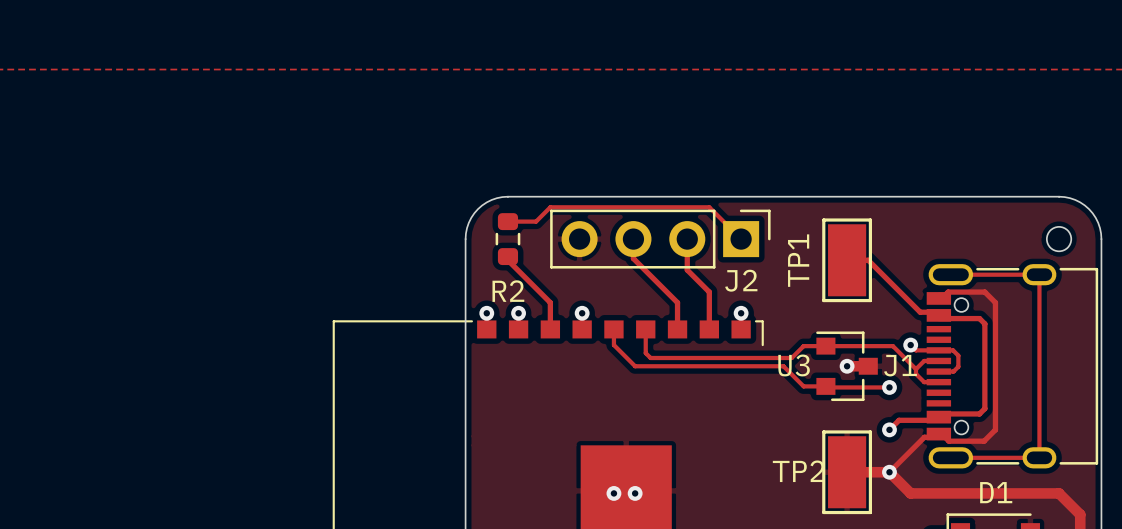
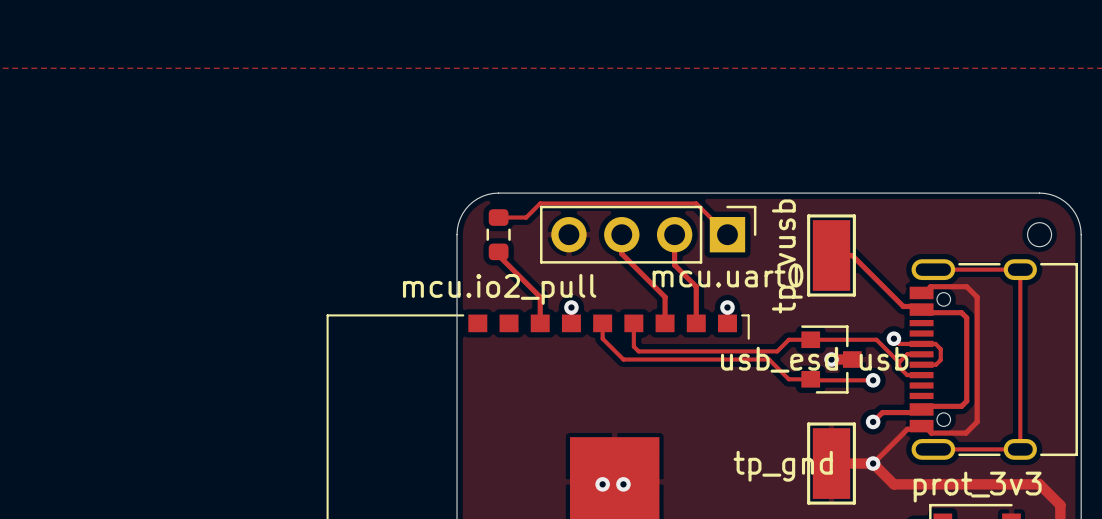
TP1 name: TP1 (798, 260) -> tp_vusb (787, 256)
J2 name: J2 (741, 280) -> mcu.uart0 (727, 275)
R2 name: R2 (508, 291) -> mcu.io2_pull (499, 289)
via: (486, 313) -> none
via: (518, 313) -> none
U3 name: U3 (794, 365) -> usb_esd (779, 359)
J1 name: J1 (900, 365) -> usb (884, 358)
TP2 name: TP2 (798, 471) -> tp_gnd (783, 466)
D1 name: D1 (996, 492) -> prot_3v3 (977, 487)

